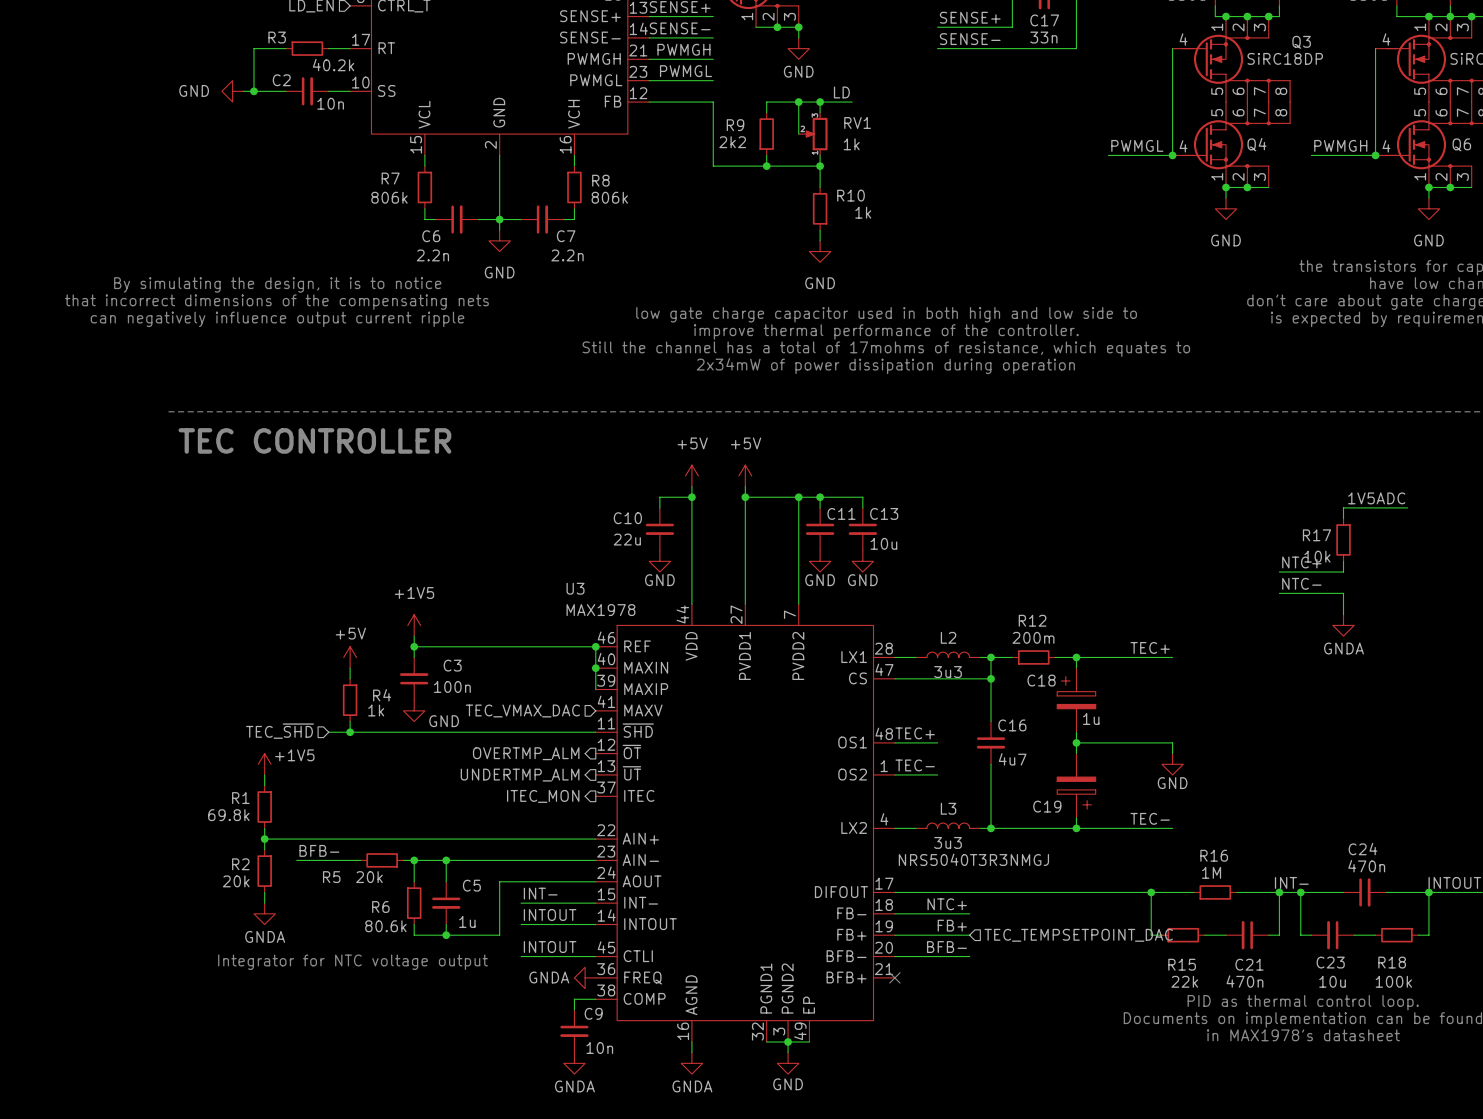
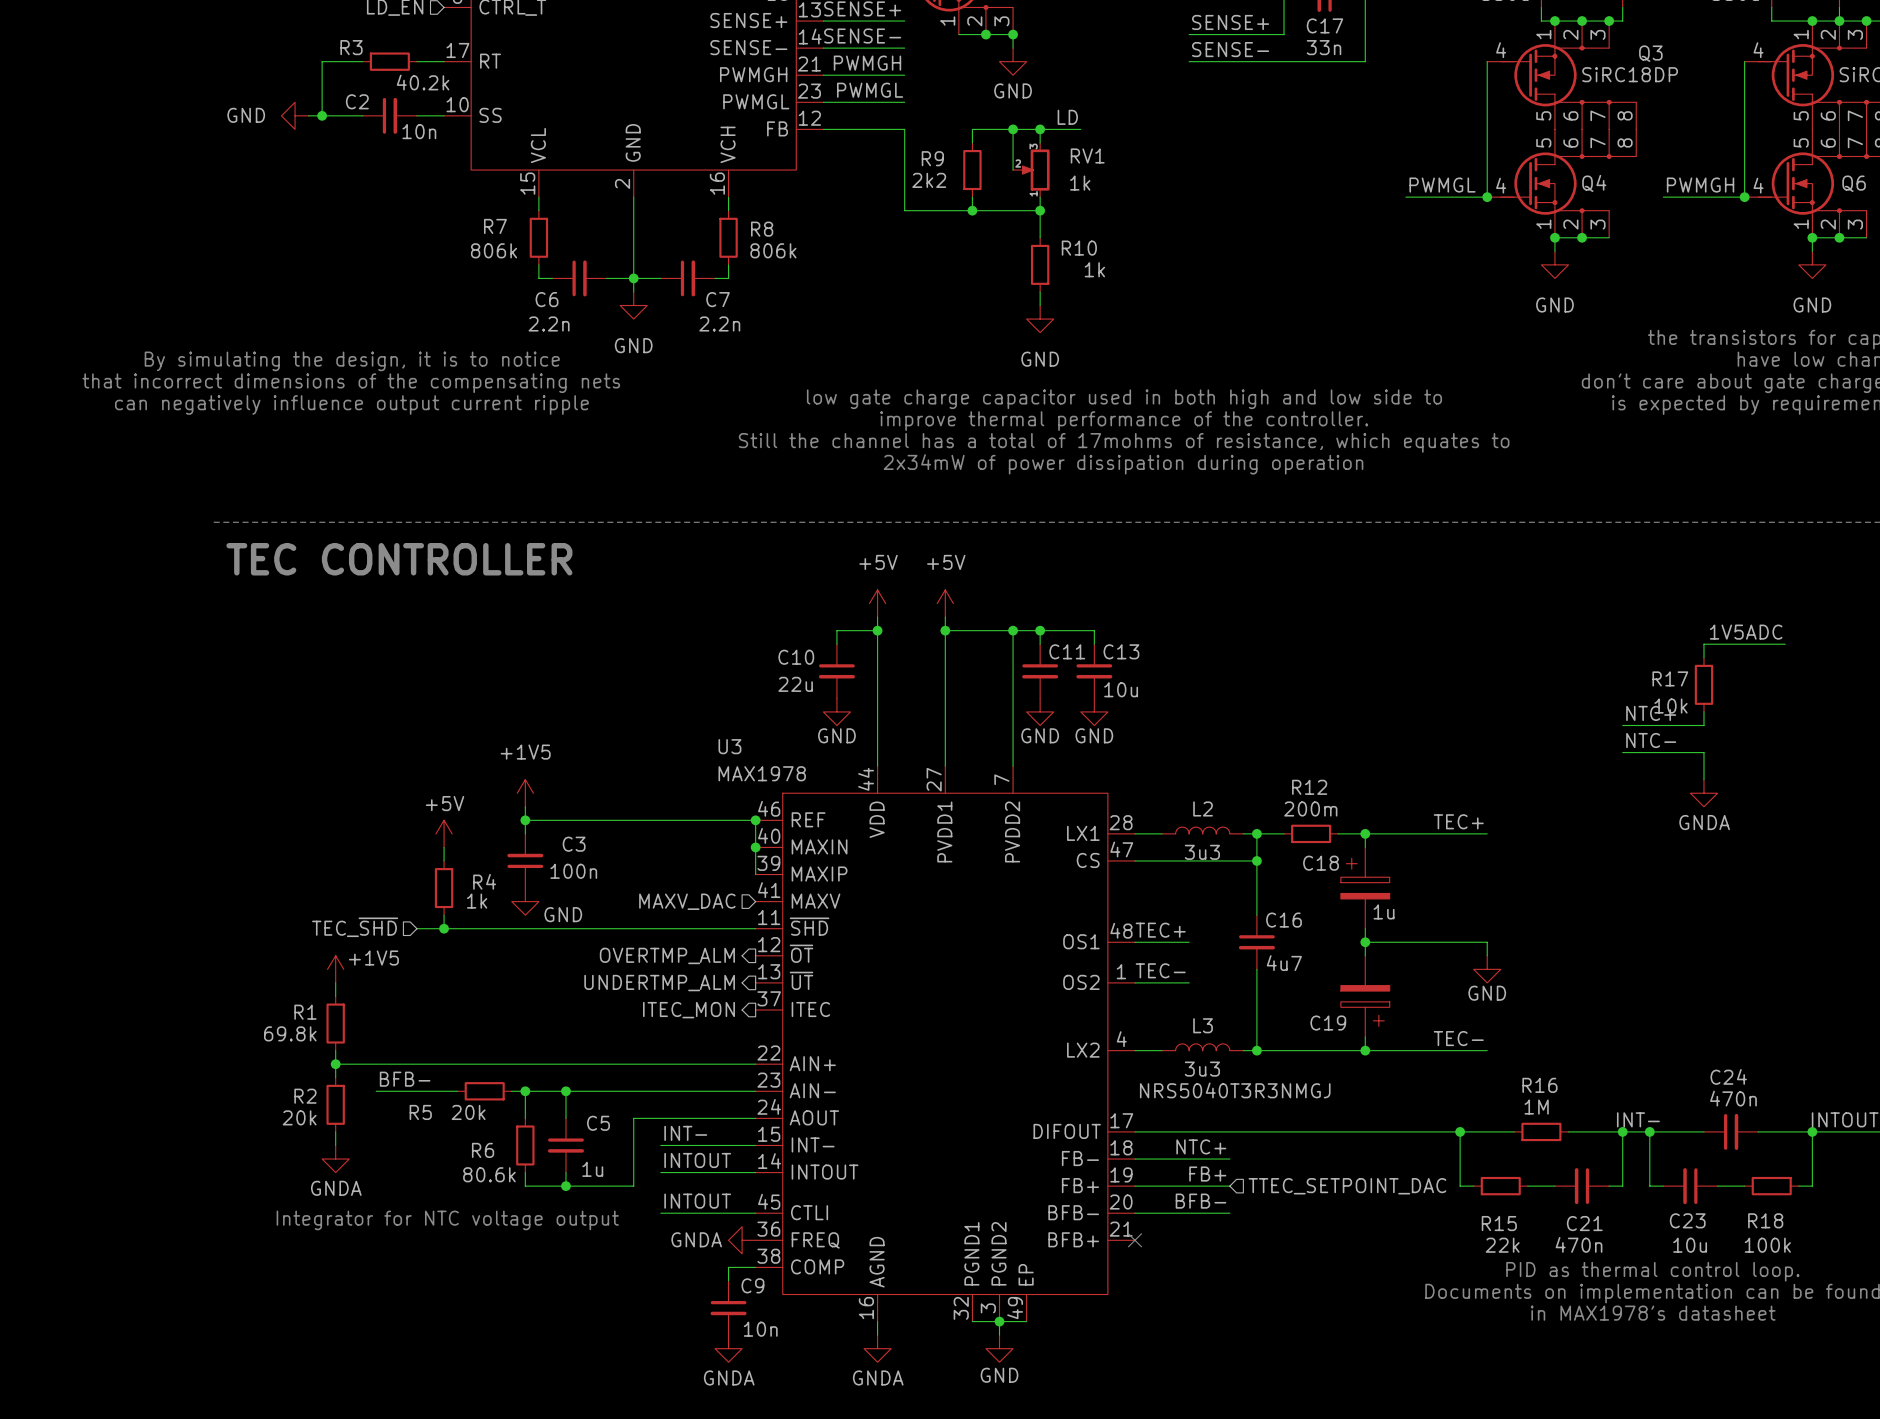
hierarchical label: TEC_VMAX_DAC (522, 710) -> MAXV_DAC (687, 901)
hierarchical label: TEC_TEMPSETPOINT_DAC (1078, 935) -> TTEC_SETPOINT_DAC (1347, 1186)

